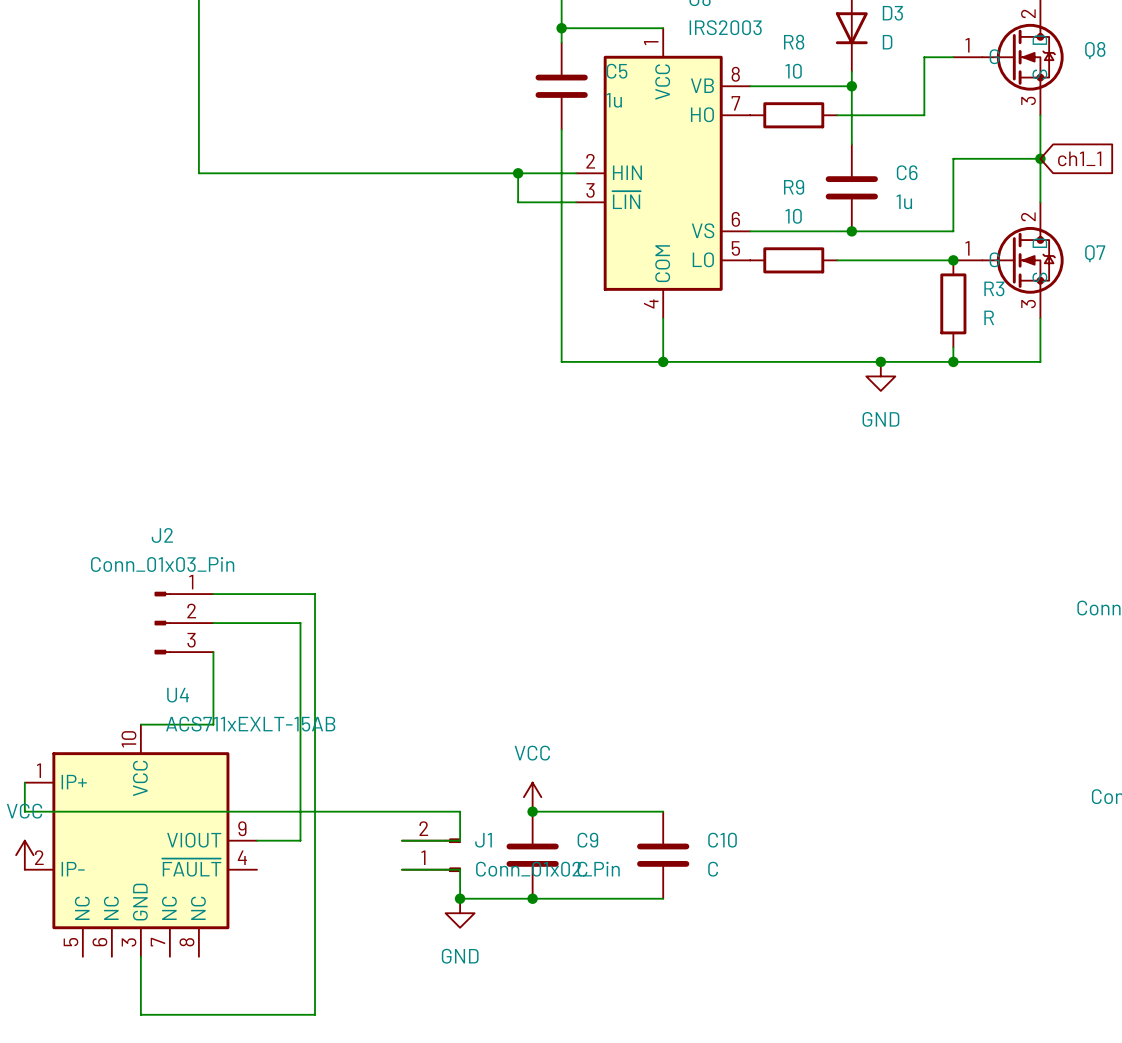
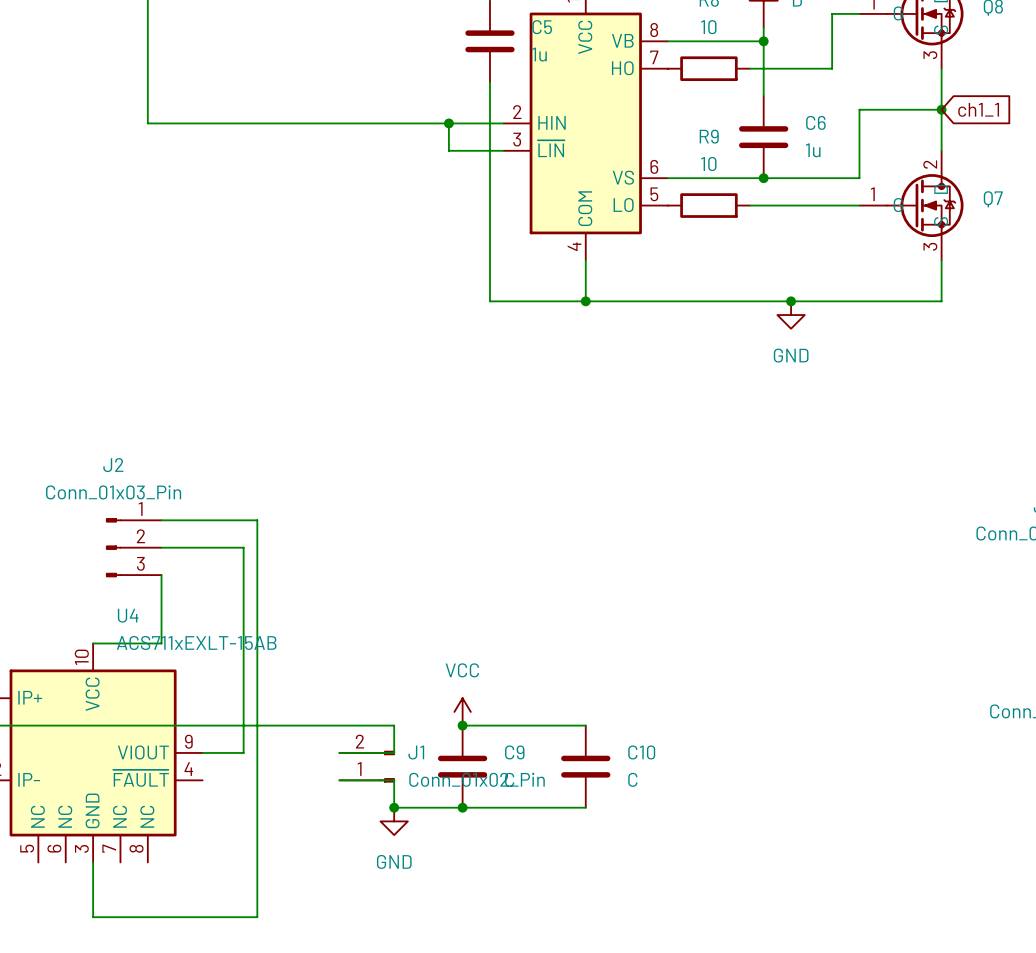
junction: (953, 260) -> none
R3: R (953, 303) -> none
wire: (953, 347) (953, 361) -> none
junction: (953, 361) -> none

